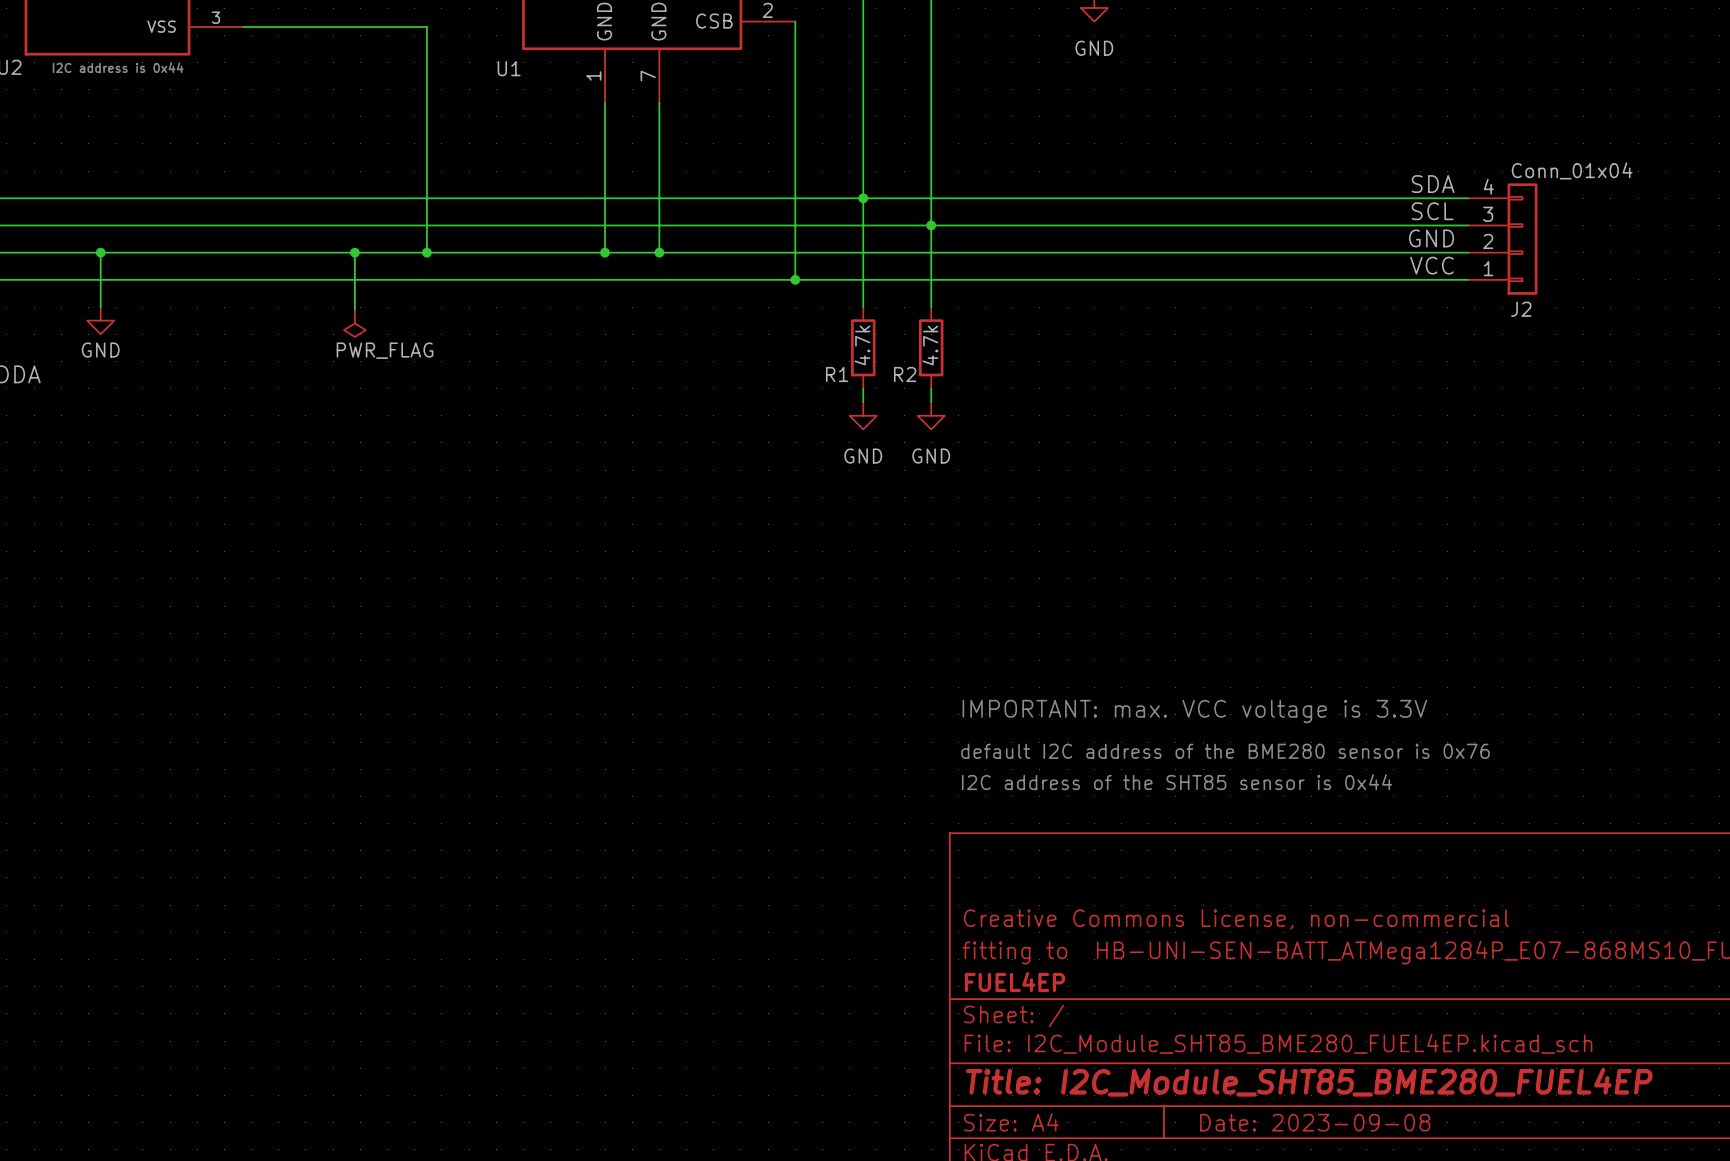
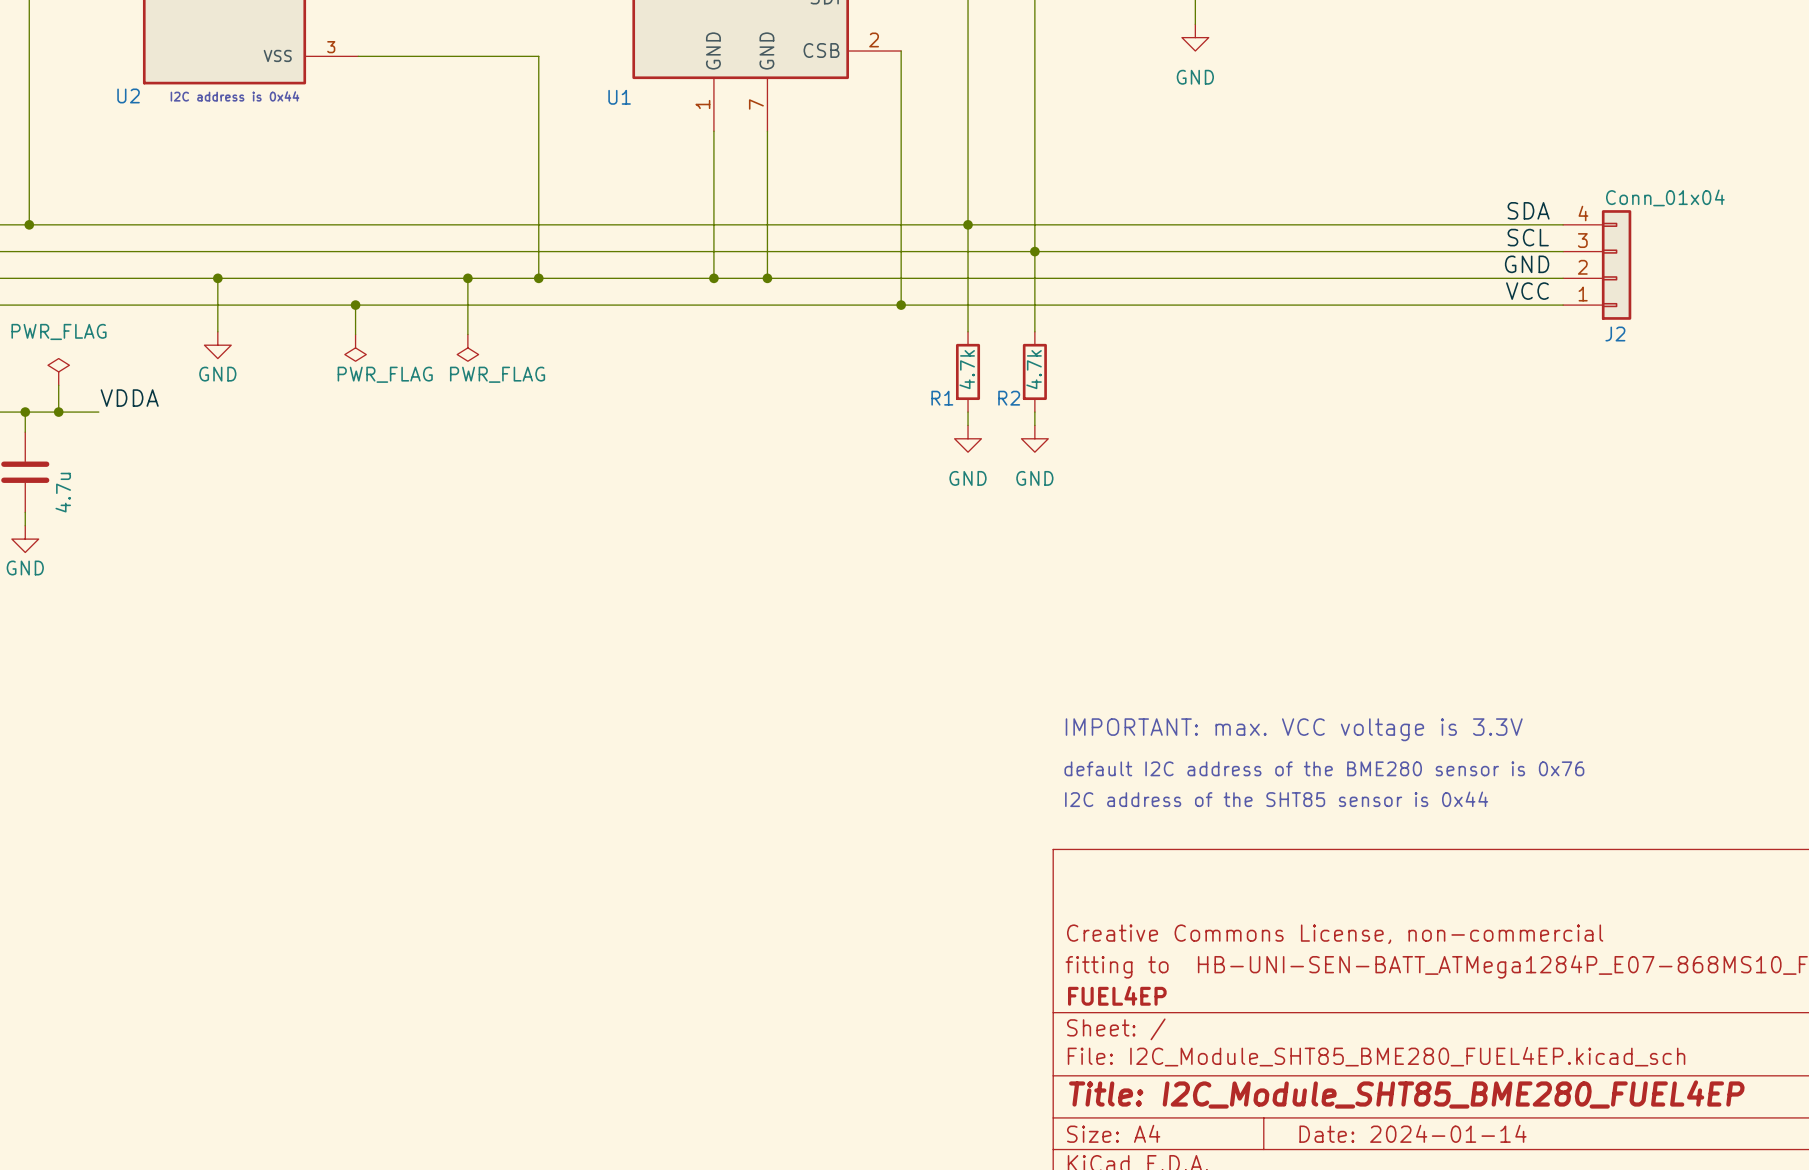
wire: none -> (355, 305) (355, 334)
junction: none -> (355, 305)
power symbol: none -> PWR_FLAG (355, 347)
title block: Date: 2023-09-08 (1315, 1122) -> Date: 2024-01-14 (1413, 1133)

